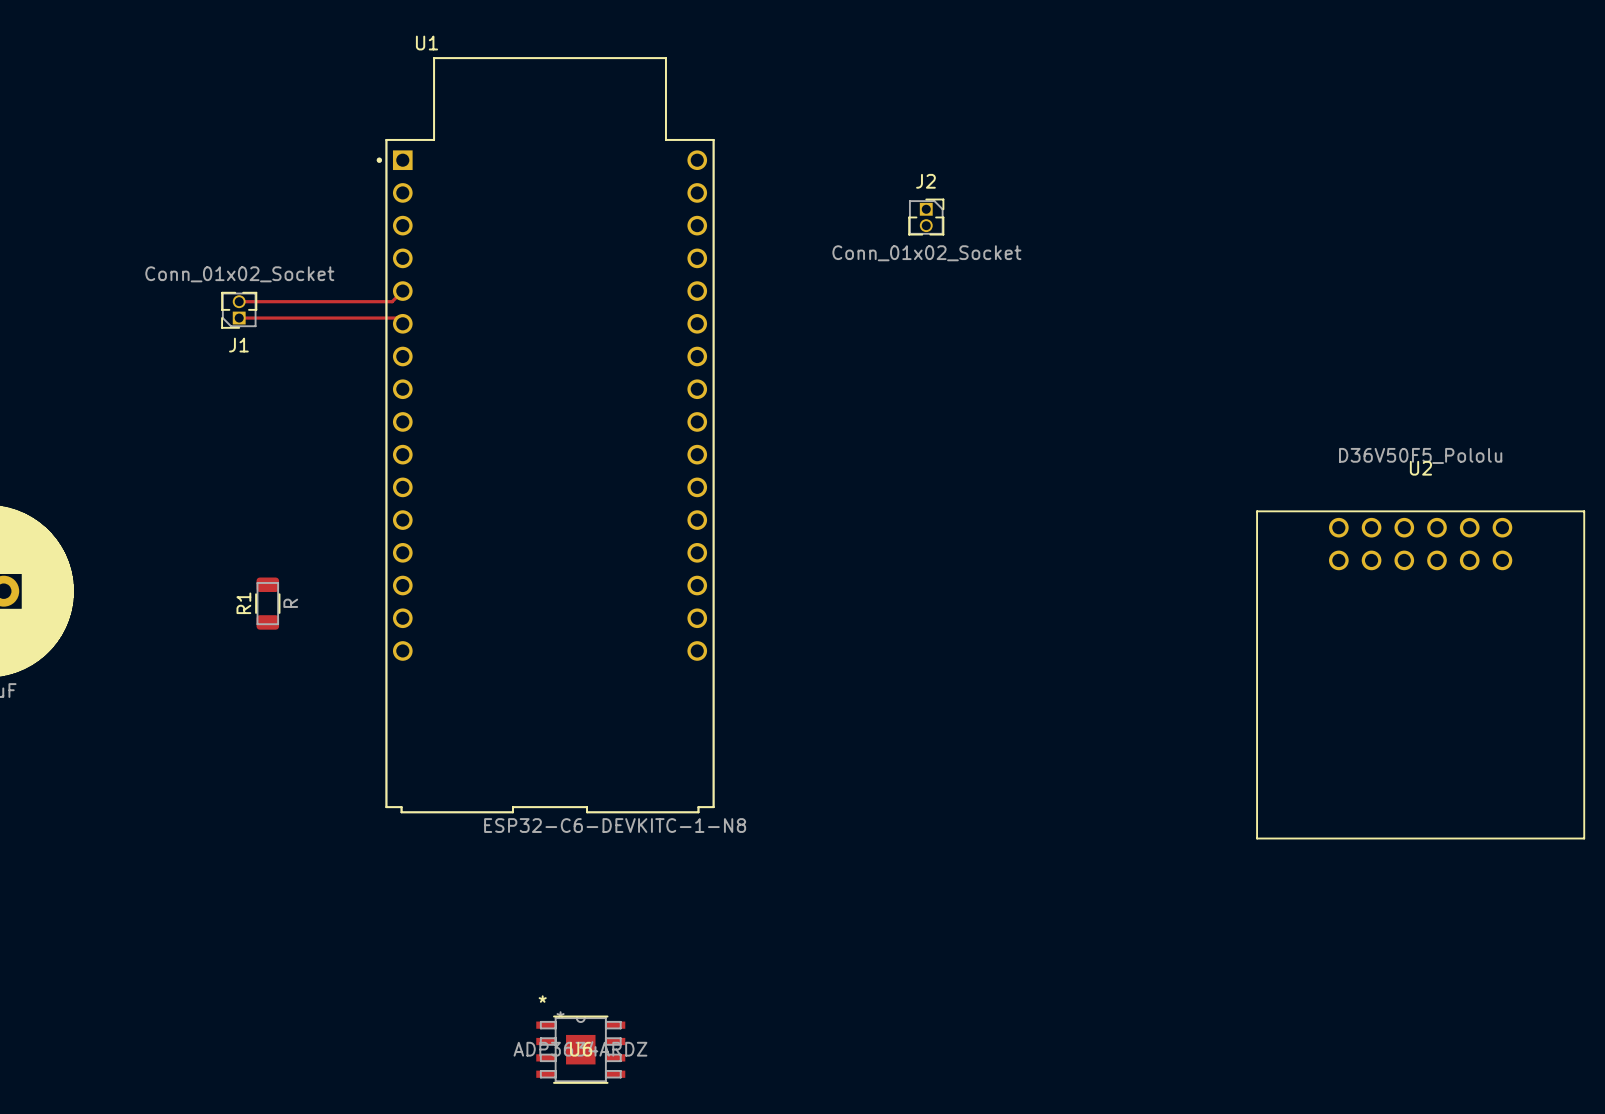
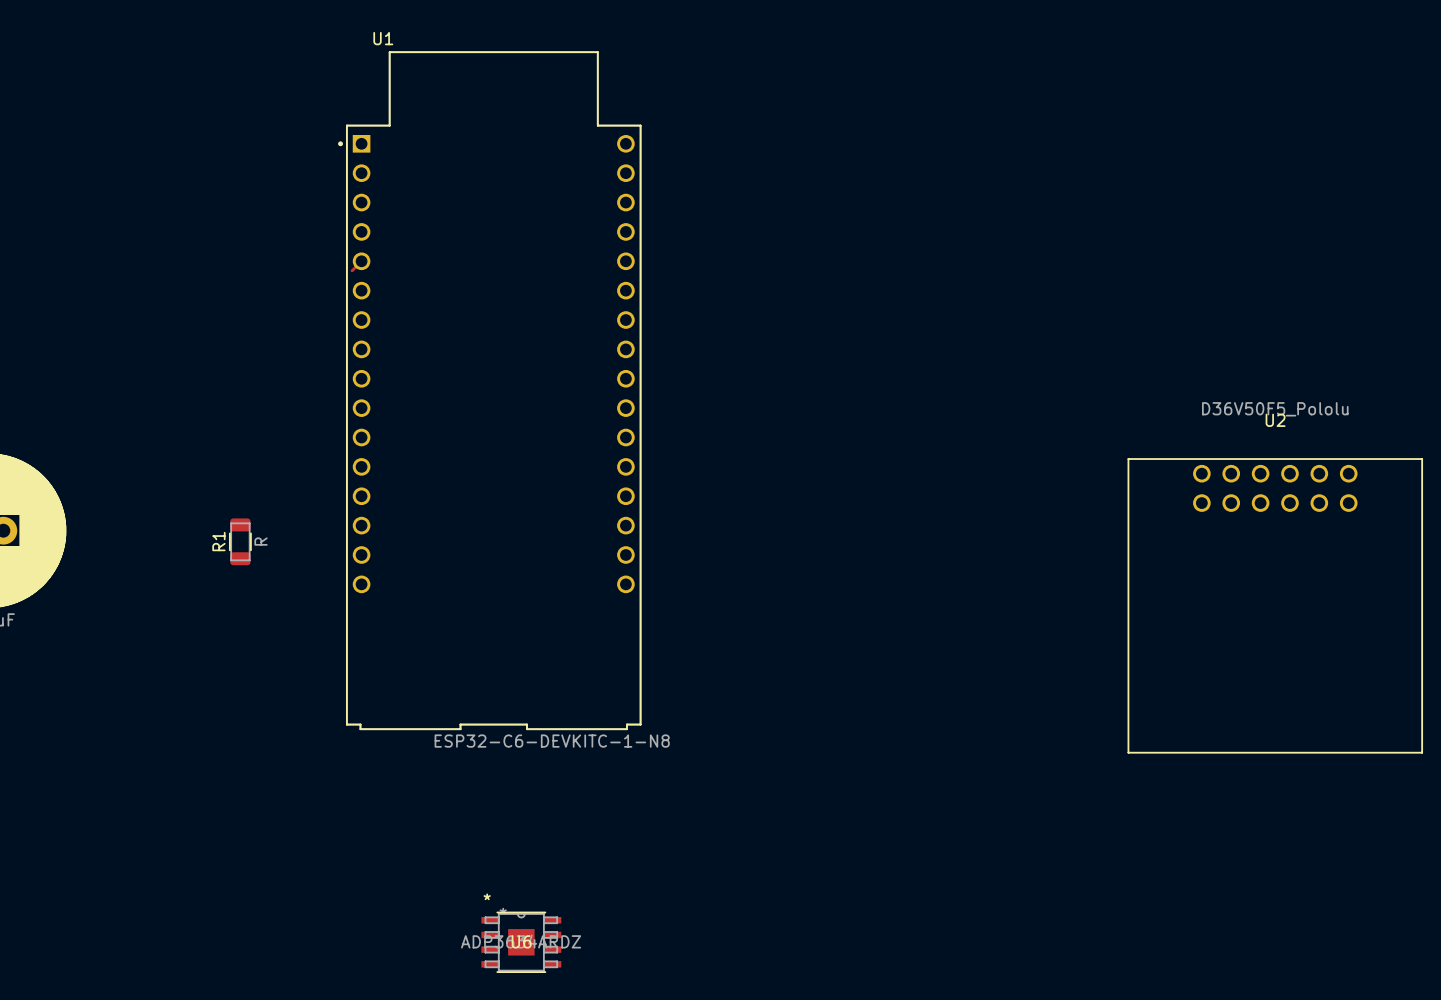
J2: Conn_01x02_Socket (926, 217) -> none
track: (239, 301) (392, 301) -> none
J1: Conn_01x02_Socket (239, 310) -> none
track: (239, 318) (397, 318) -> none

